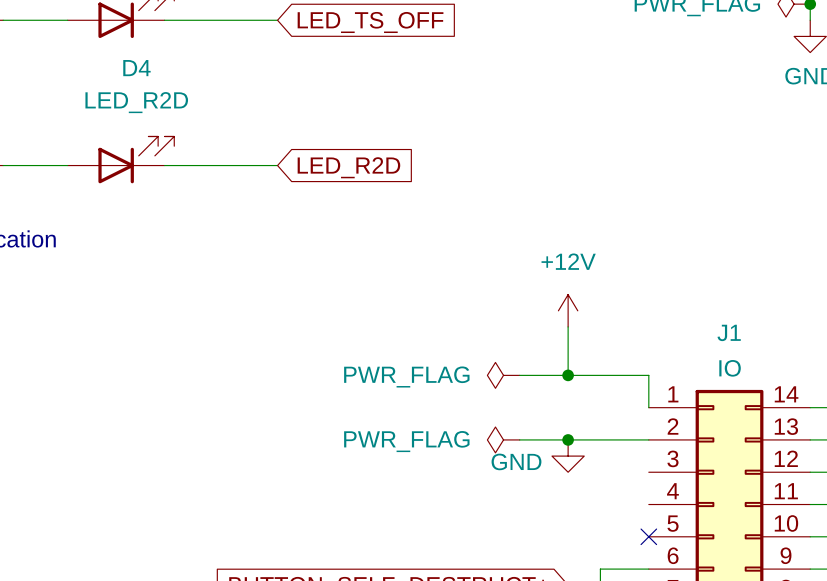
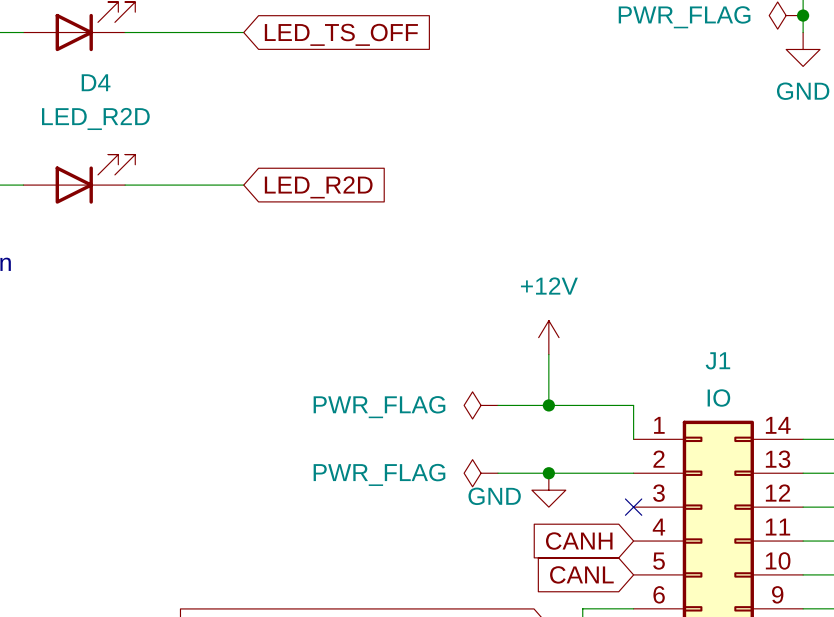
global label: none -> CANH (579, 541)
global label: none -> CANL (581, 574)
no-connect mark position: (648, 536) -> (633, 507)

